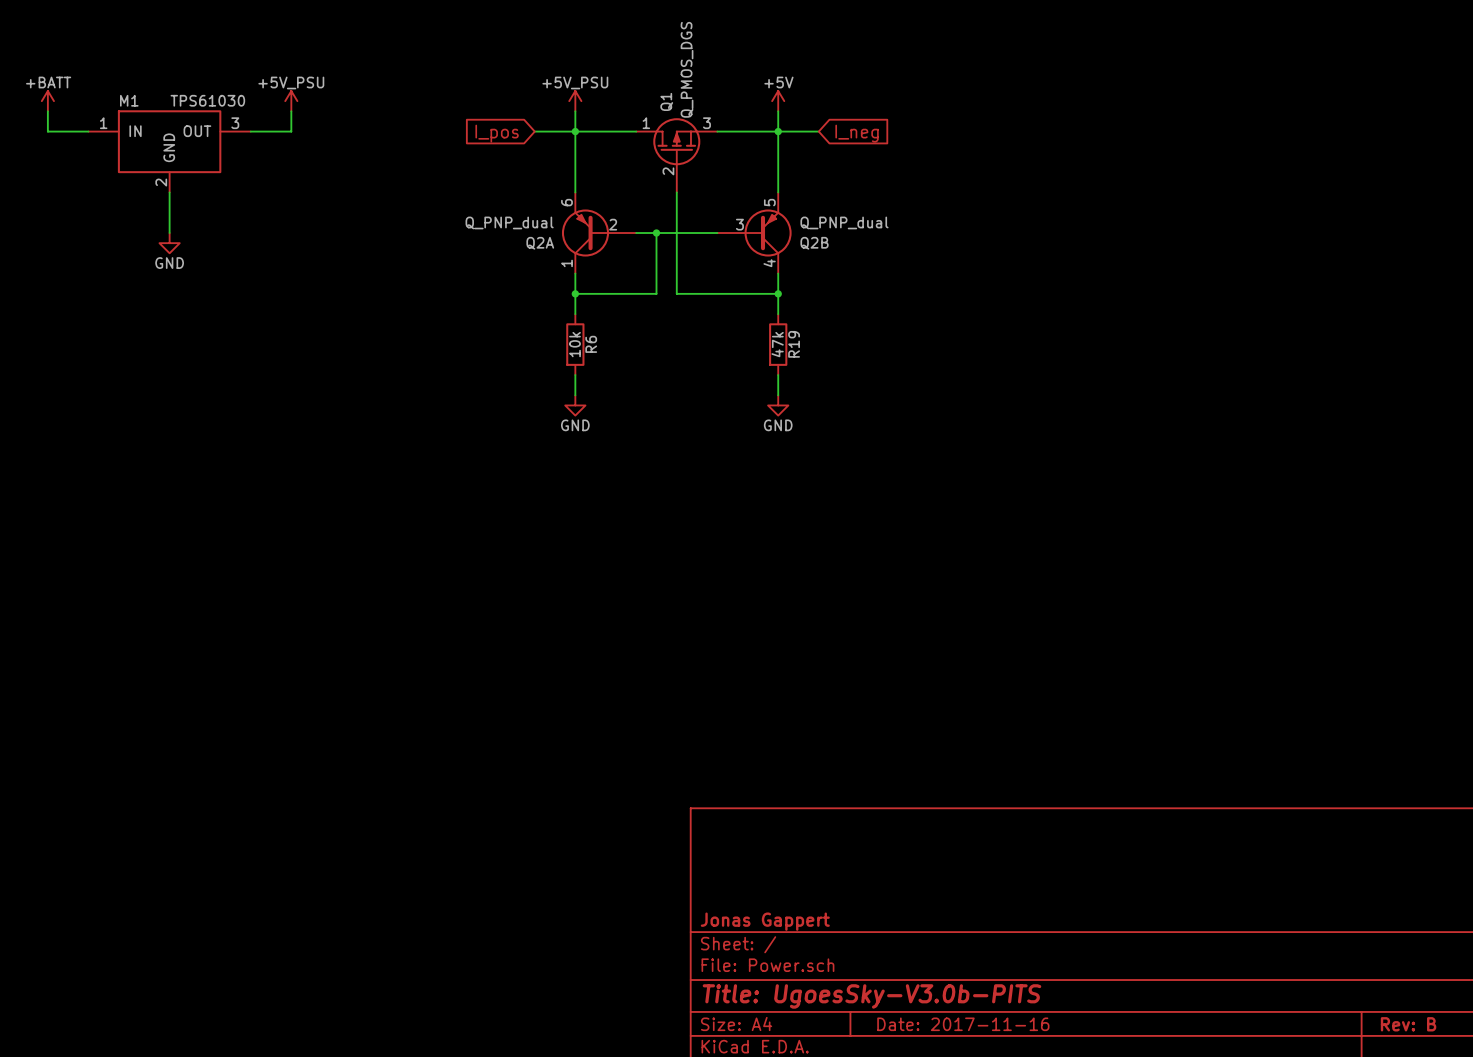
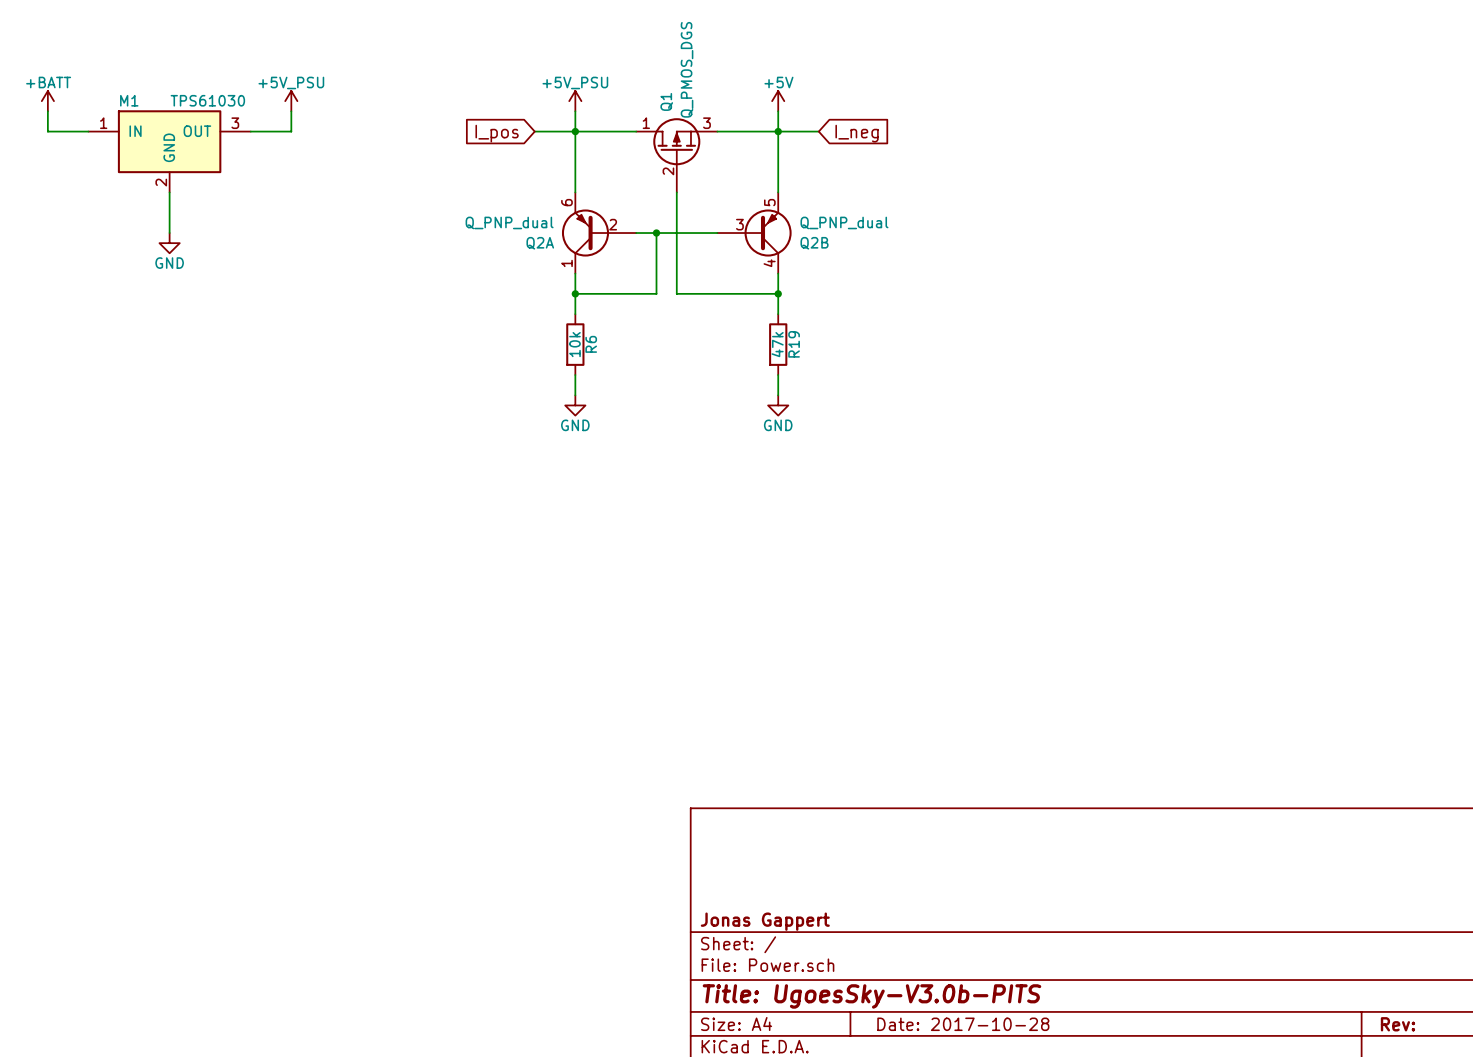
title block: Date: 2017-11-16 (963, 1024) -> Date: 2017-10-28 (963, 1024)
title block: Rev: B (1408, 1024) -> Rev: (1397, 1024)

